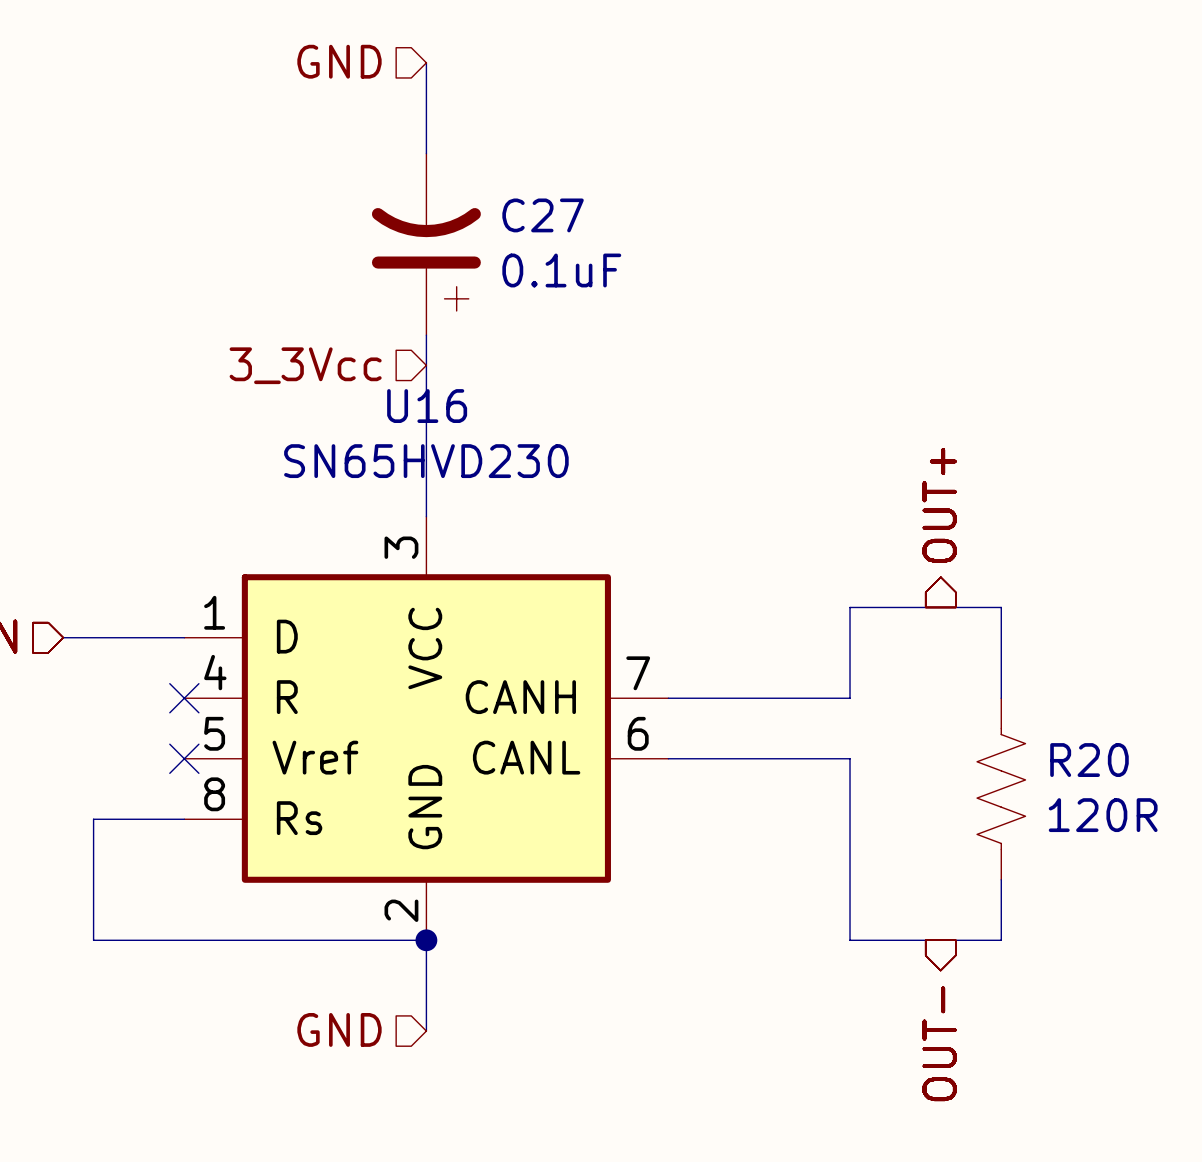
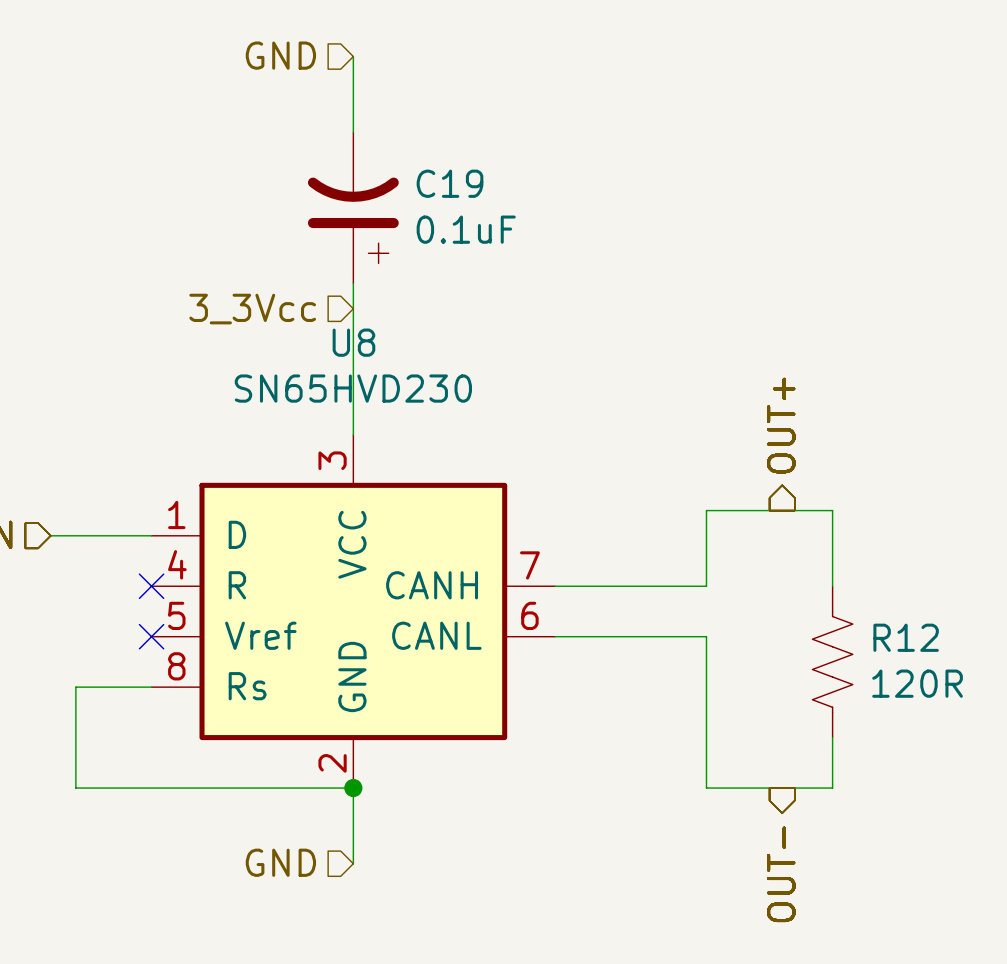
C27 name: C27 (543, 215) -> C19 (449, 183)
U16 name: U16 (427, 406) -> U8 (353, 342)
R20 name: R20 (1089, 760) -> R12 (906, 637)

